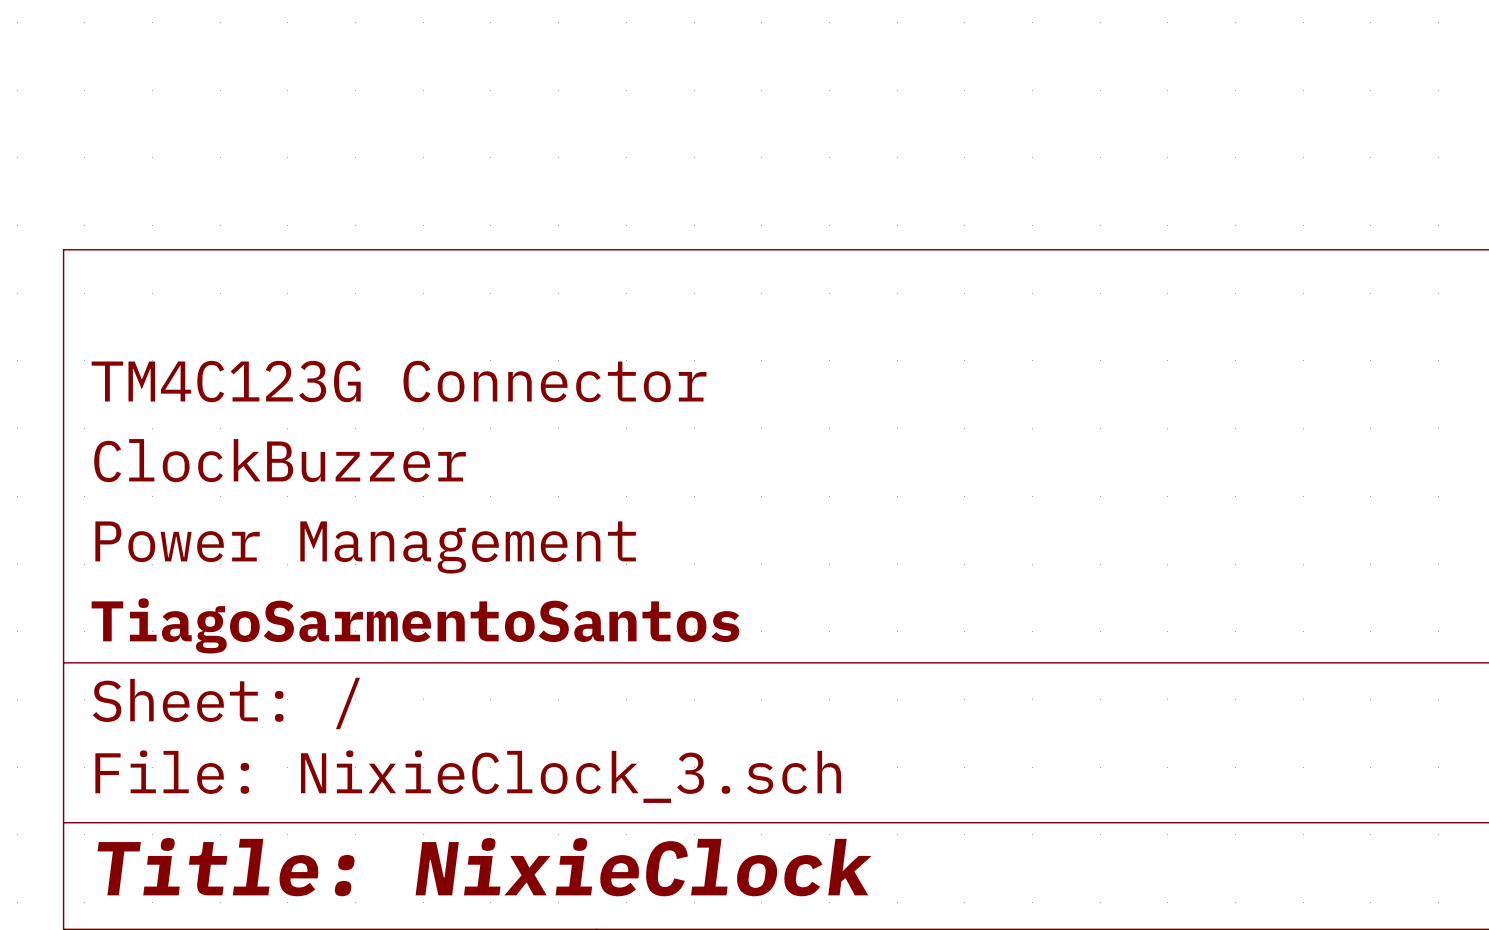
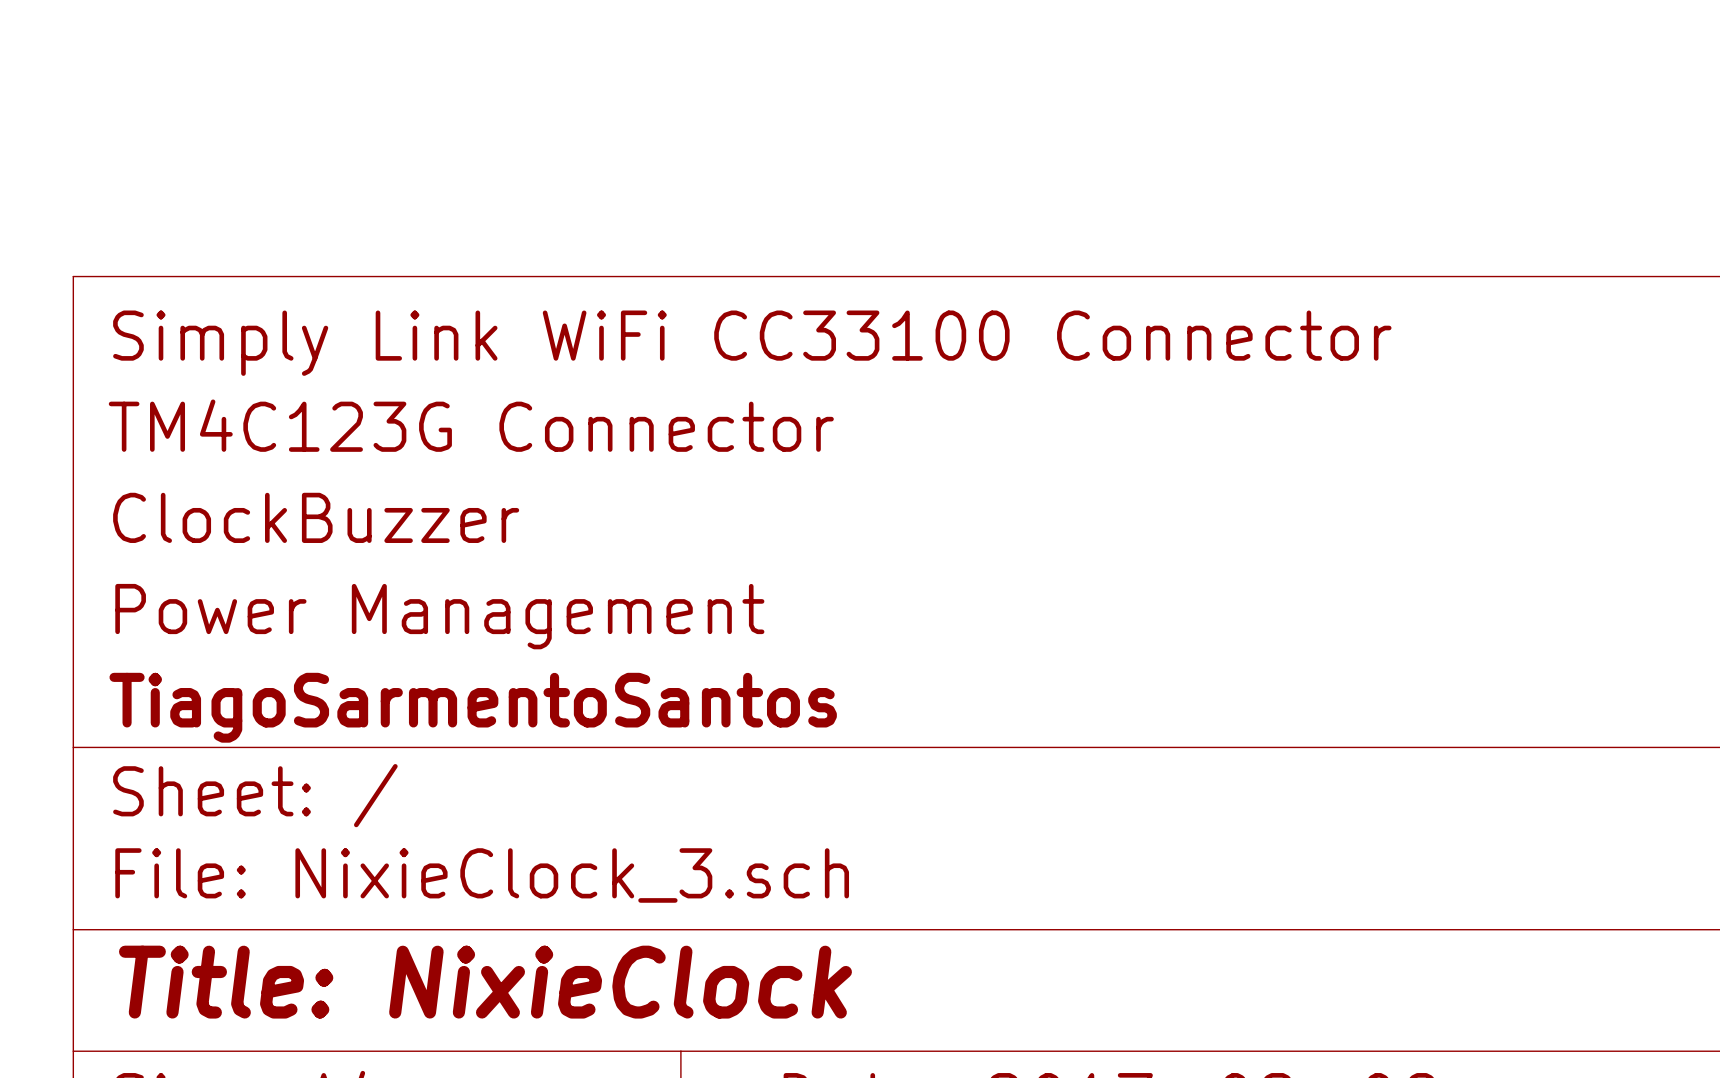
title block: none -> Simply Link WiFi CC33100 Connector (752, 343)

